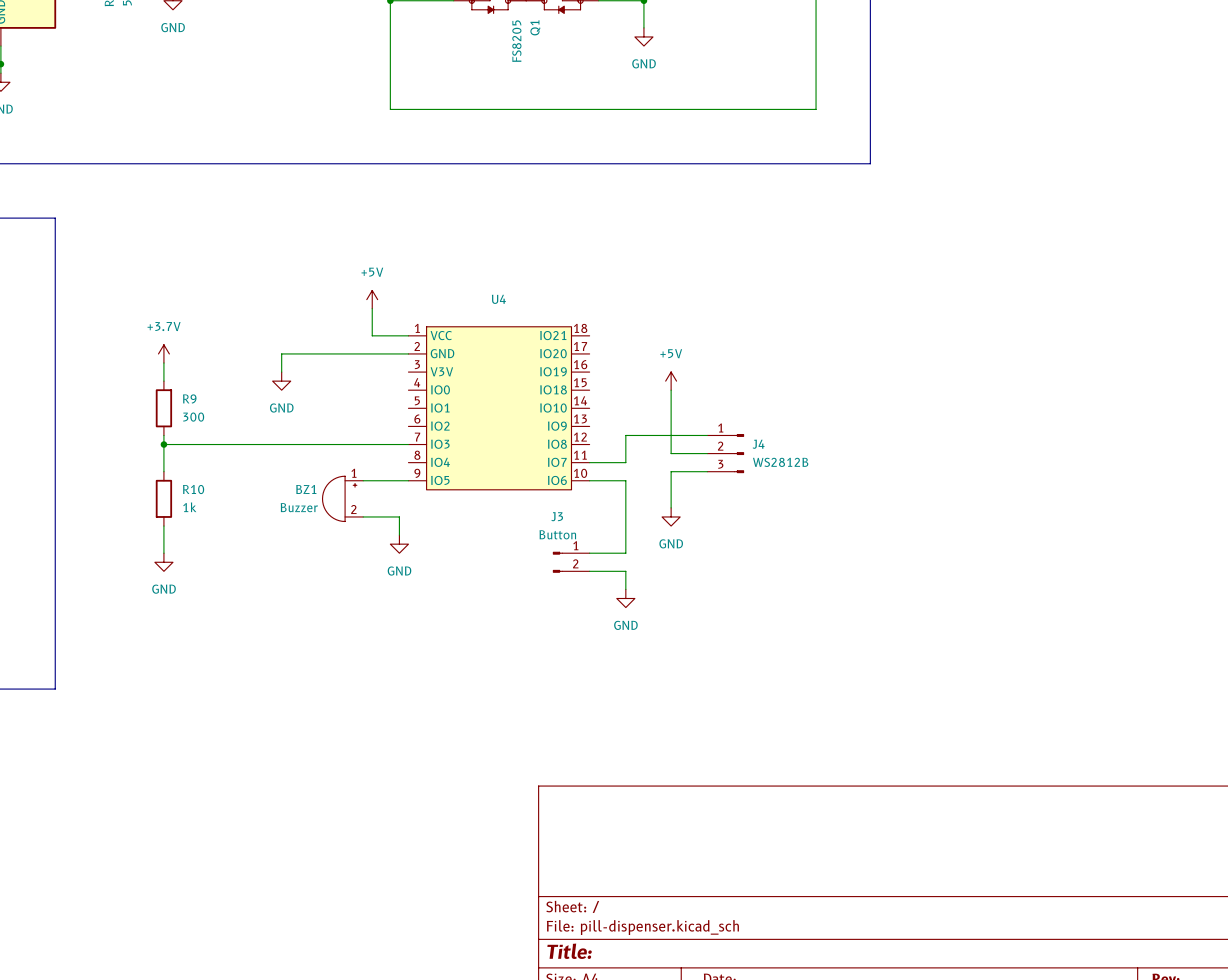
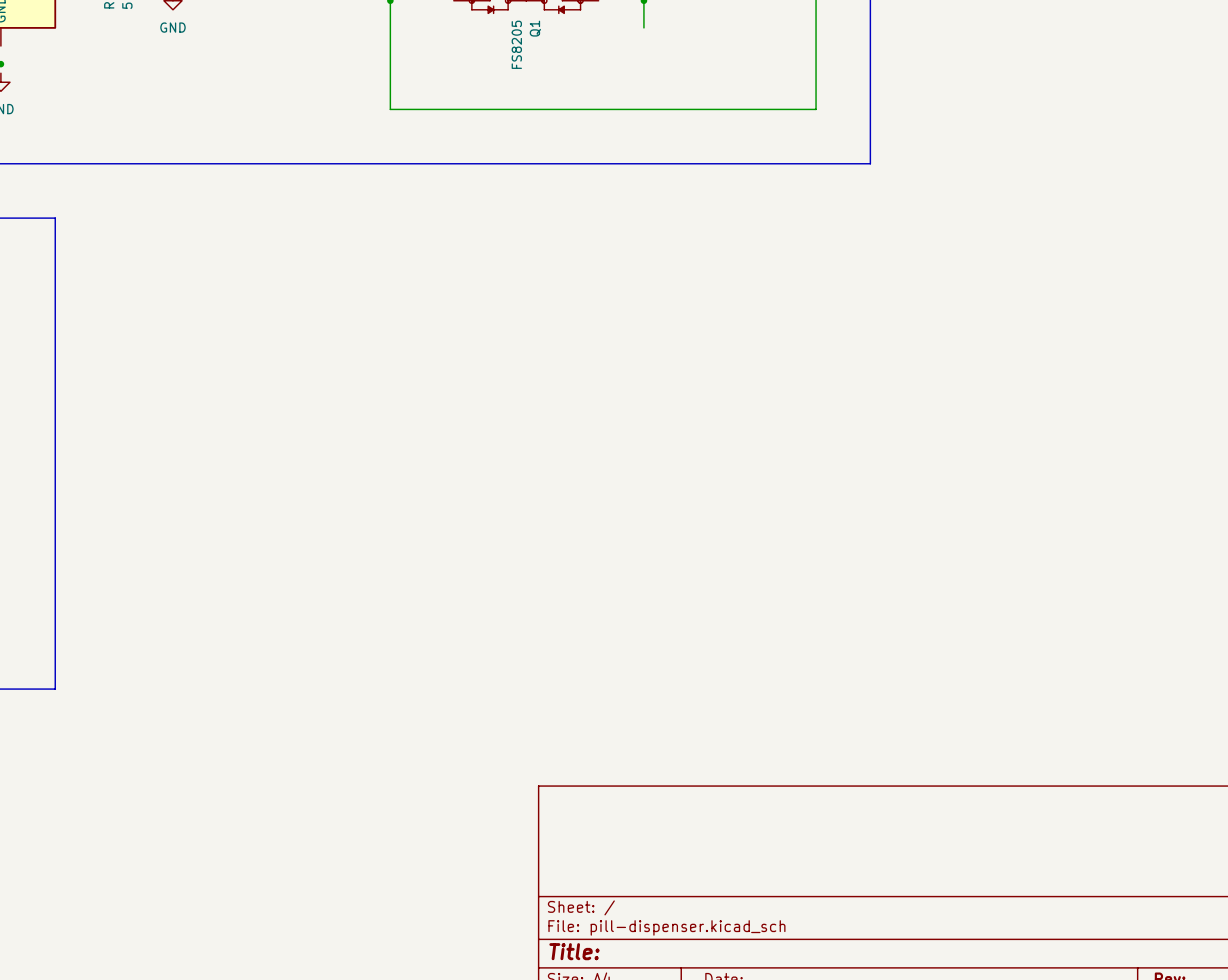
wire: (390, 0) (453, 0) -> none
wire: (598, 0) (643, 0) -> none
power symbol: GND (643, 36) -> none
wire: (0, 46) (0, 73) -> none
power symbol: +5V (372, 299) -> none
wire: (372, 308) (372, 335) (408, 335) -> none
power symbol: +3.7V (163, 353) -> none
wire: (408, 353) (281, 353) (281, 372) -> none
wire: (163, 363) (163, 381) -> none
power symbol: GND (281, 381) -> none
power symbol: +5V (671, 381) -> none
wire: (671, 390) (671, 453) (707, 453) -> none
R9: 300 (163, 408) -> none
U4: (499, 408) -> none
wire: (163, 435) (163, 471) -> none
wire: (707, 435) (625, 435) (625, 462) (589, 462) -> none
wire: (163, 444) (408, 444) -> none
junction: (163, 444) -> none
J4: WS2812B (725, 453) -> none
wire: (707, 471) (671, 471) (671, 507) -> none
wire: (363, 480) (408, 480) -> none
wire: (589, 480) (625, 480) (625, 553) (589, 553) -> none
R10: 1k (163, 498) -> none
BZ1: Buzzer (342, 498) -> none
wire: (363, 516) (399, 516) (399, 535) -> none
power symbol: GND (671, 516) -> none
wire: (163, 526) (163, 553) -> none
power symbol: GND (399, 544) -> none
power symbol: GND (163, 562) -> none
J3: Button (571, 562) -> none
wire: (589, 571) (625, 571) (625, 589) -> none
power symbol: GND (625, 598) -> none

